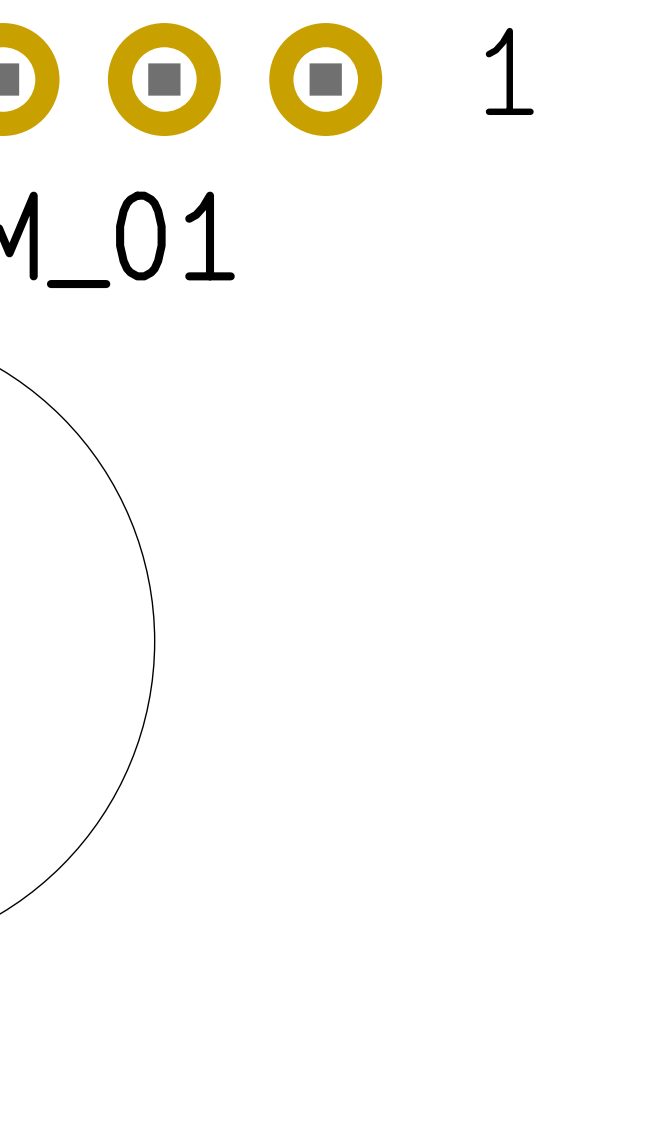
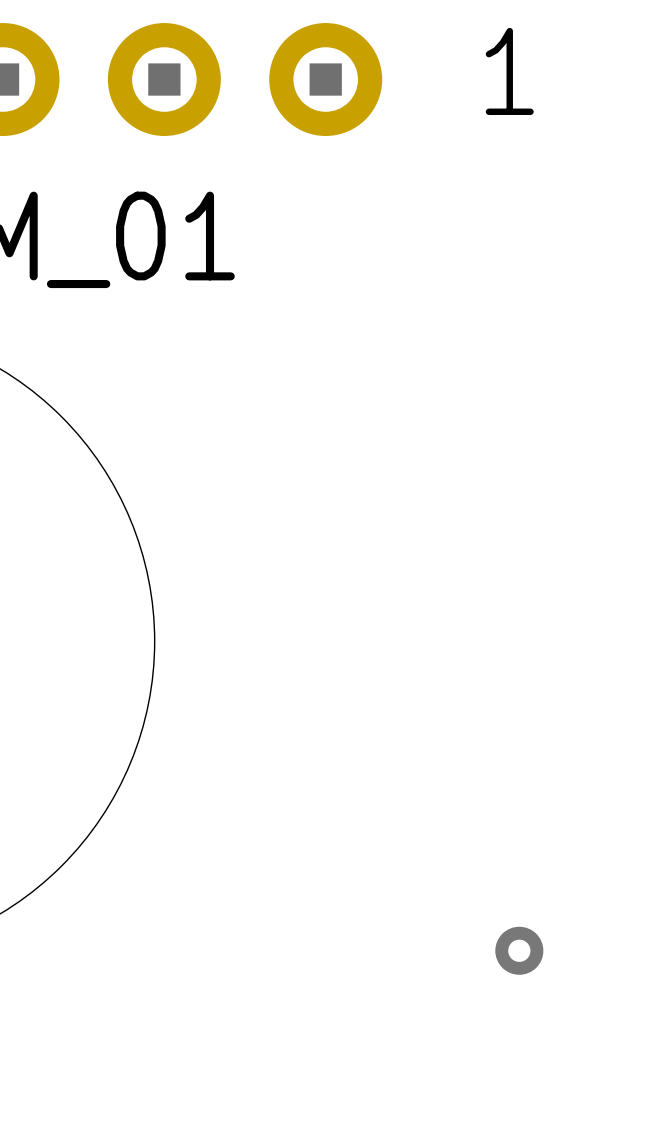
via: none -> (519, 950)

